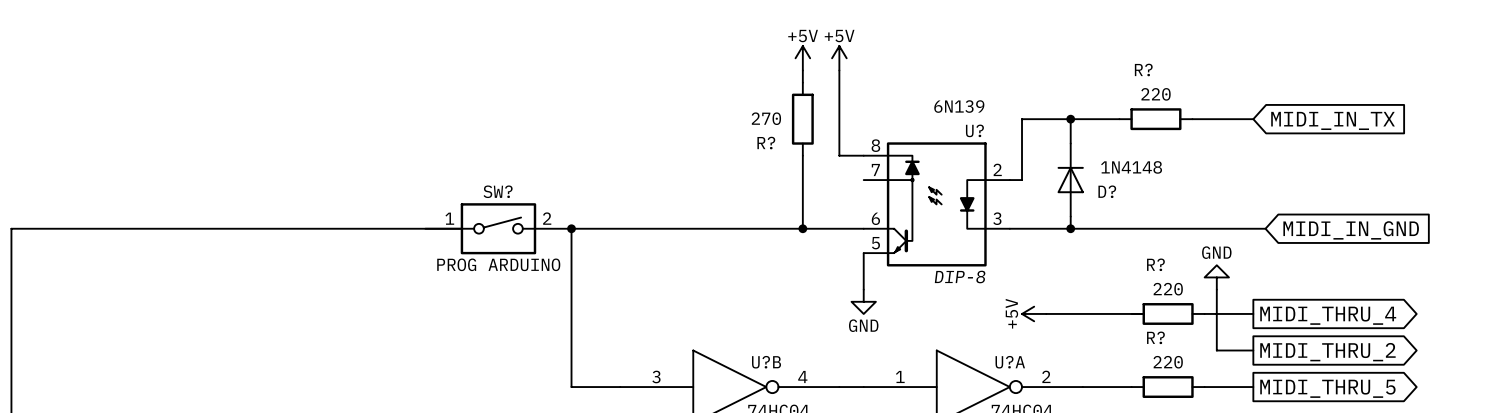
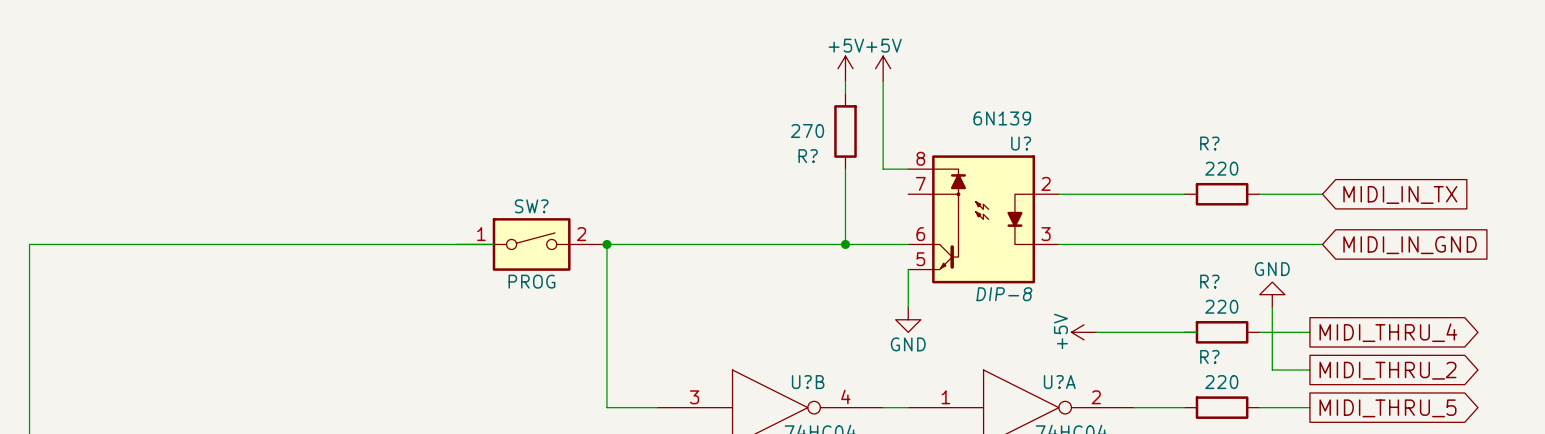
wire: (1070, 119) (1070, 143) -> none
junction: (1070, 119) -> none
wire: (1119, 119) (1022, 119) (1022, 180) -> (1184, 194) (1071, 194)
R? position: (1155, 119) -> (1222, 194)
wire: (1192, 119) (1253, 119) -> (1259, 194) (1322, 194)
global label position: MIDI_IN_TX (1333, 120) -> MIDI_IN_TX (1400, 194)
D?: 1N4148 (1070, 180) -> none
wire: (1070, 216) (1070, 228) -> none
junction: (1070, 228) -> none
SW? value: PROG ARDUINO (498, 264) -> PROG (531, 281)

